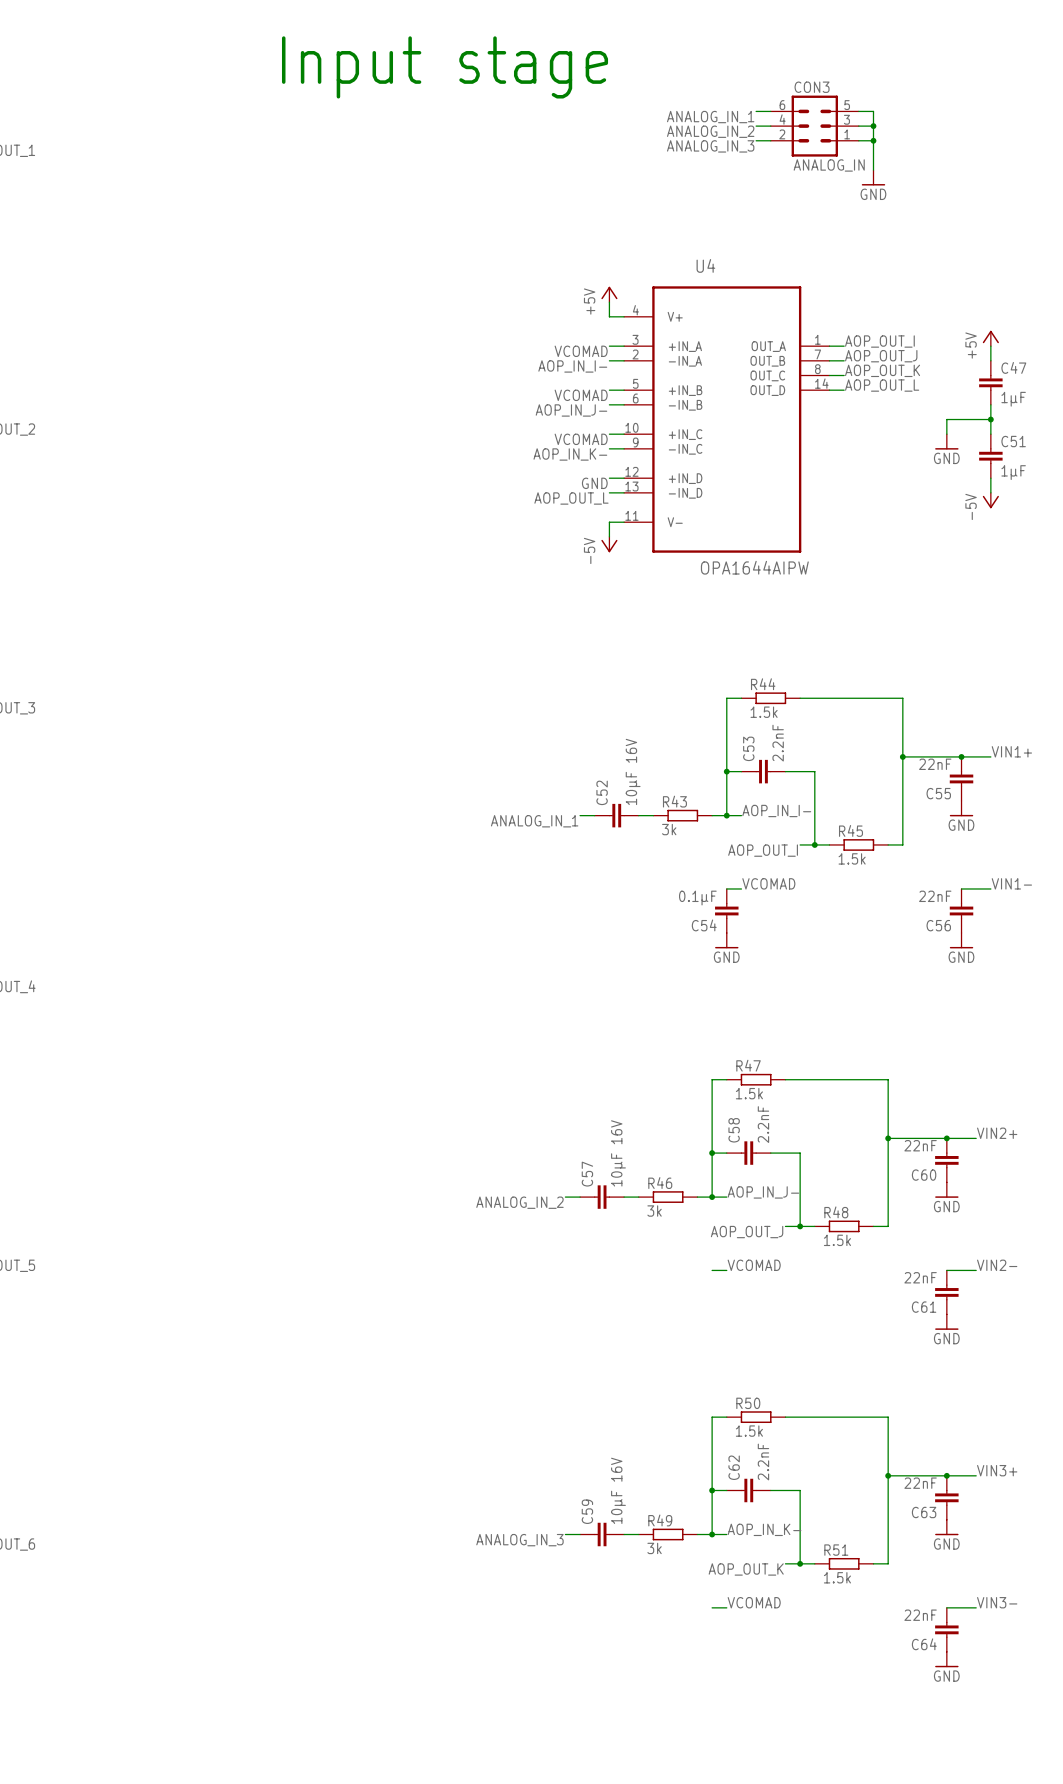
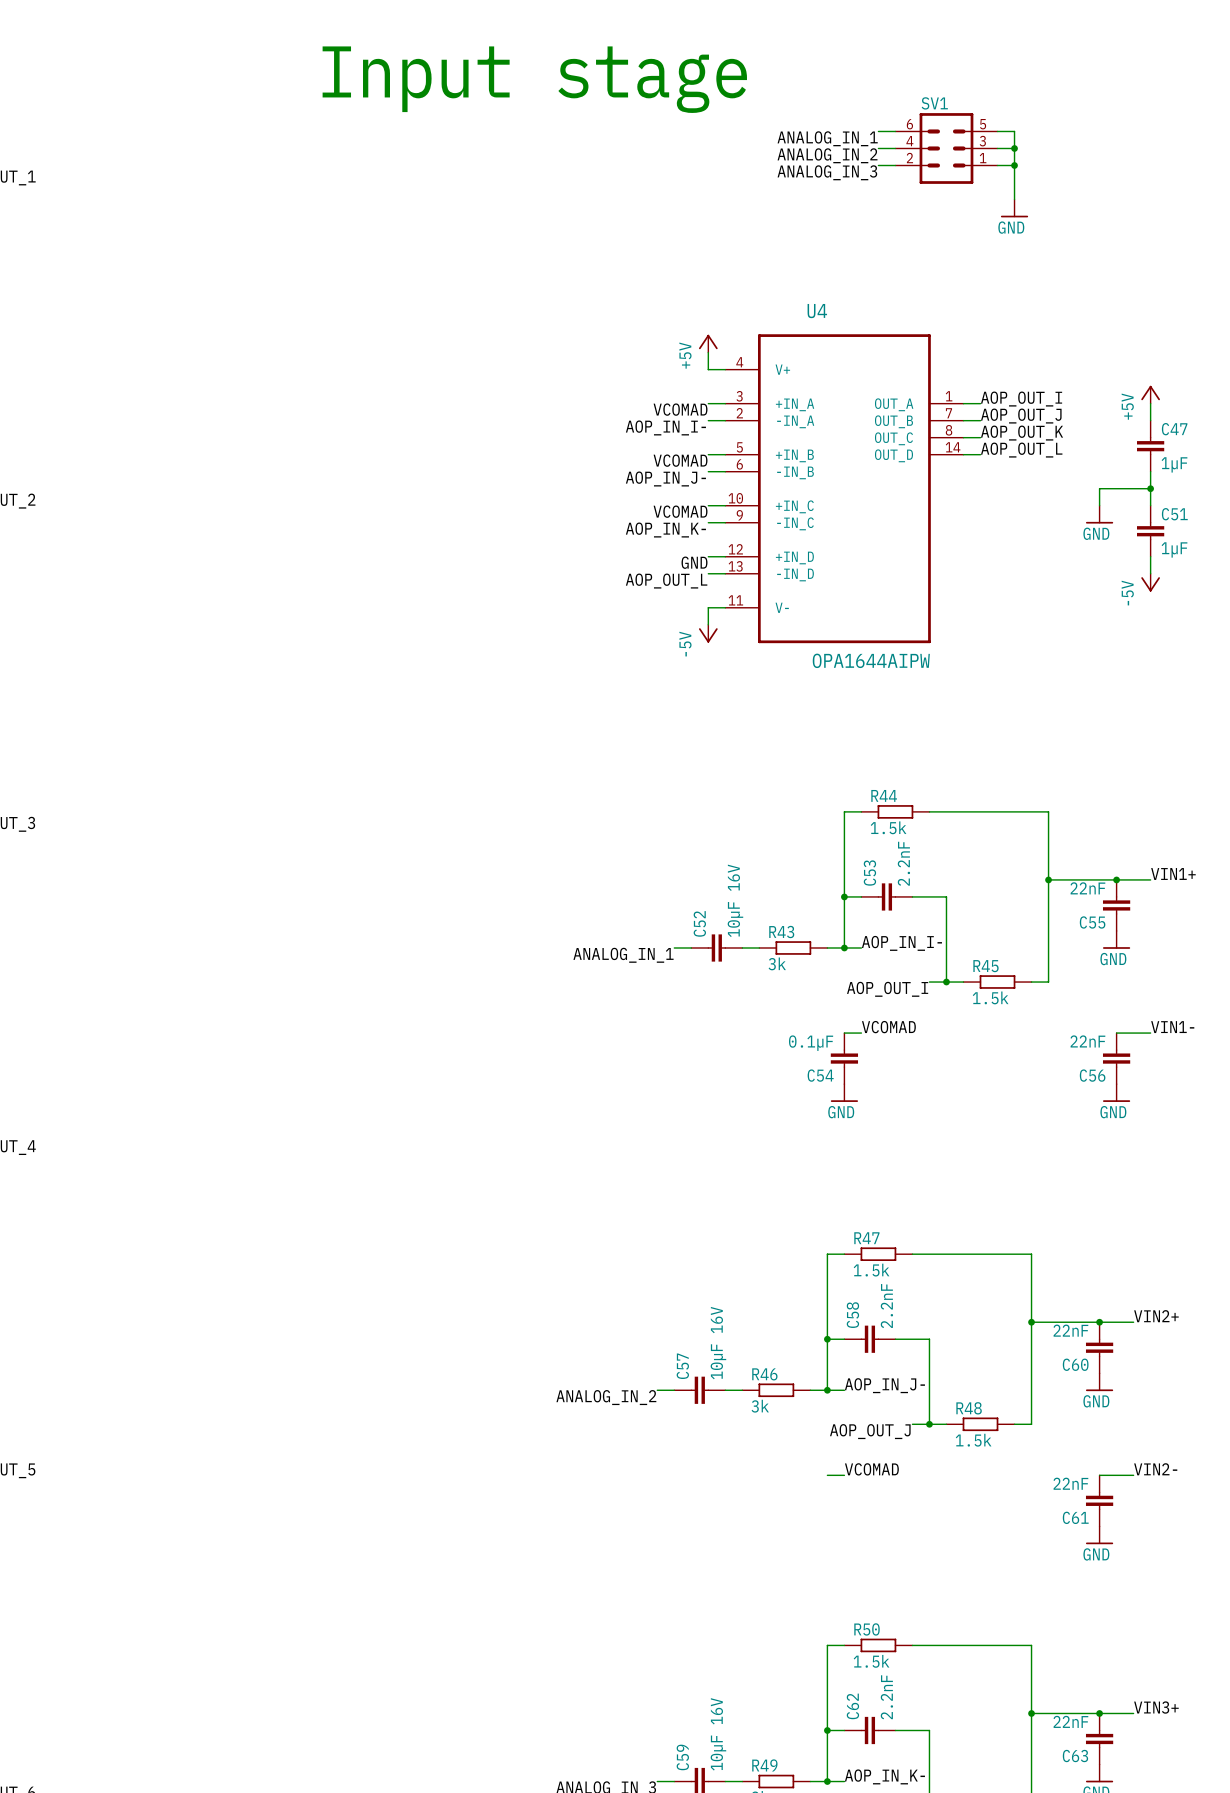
CON3 name: CON3 (812, 87) -> SV1 (934, 103)
CON3 value: ANALOG_IN (829, 165) -> none

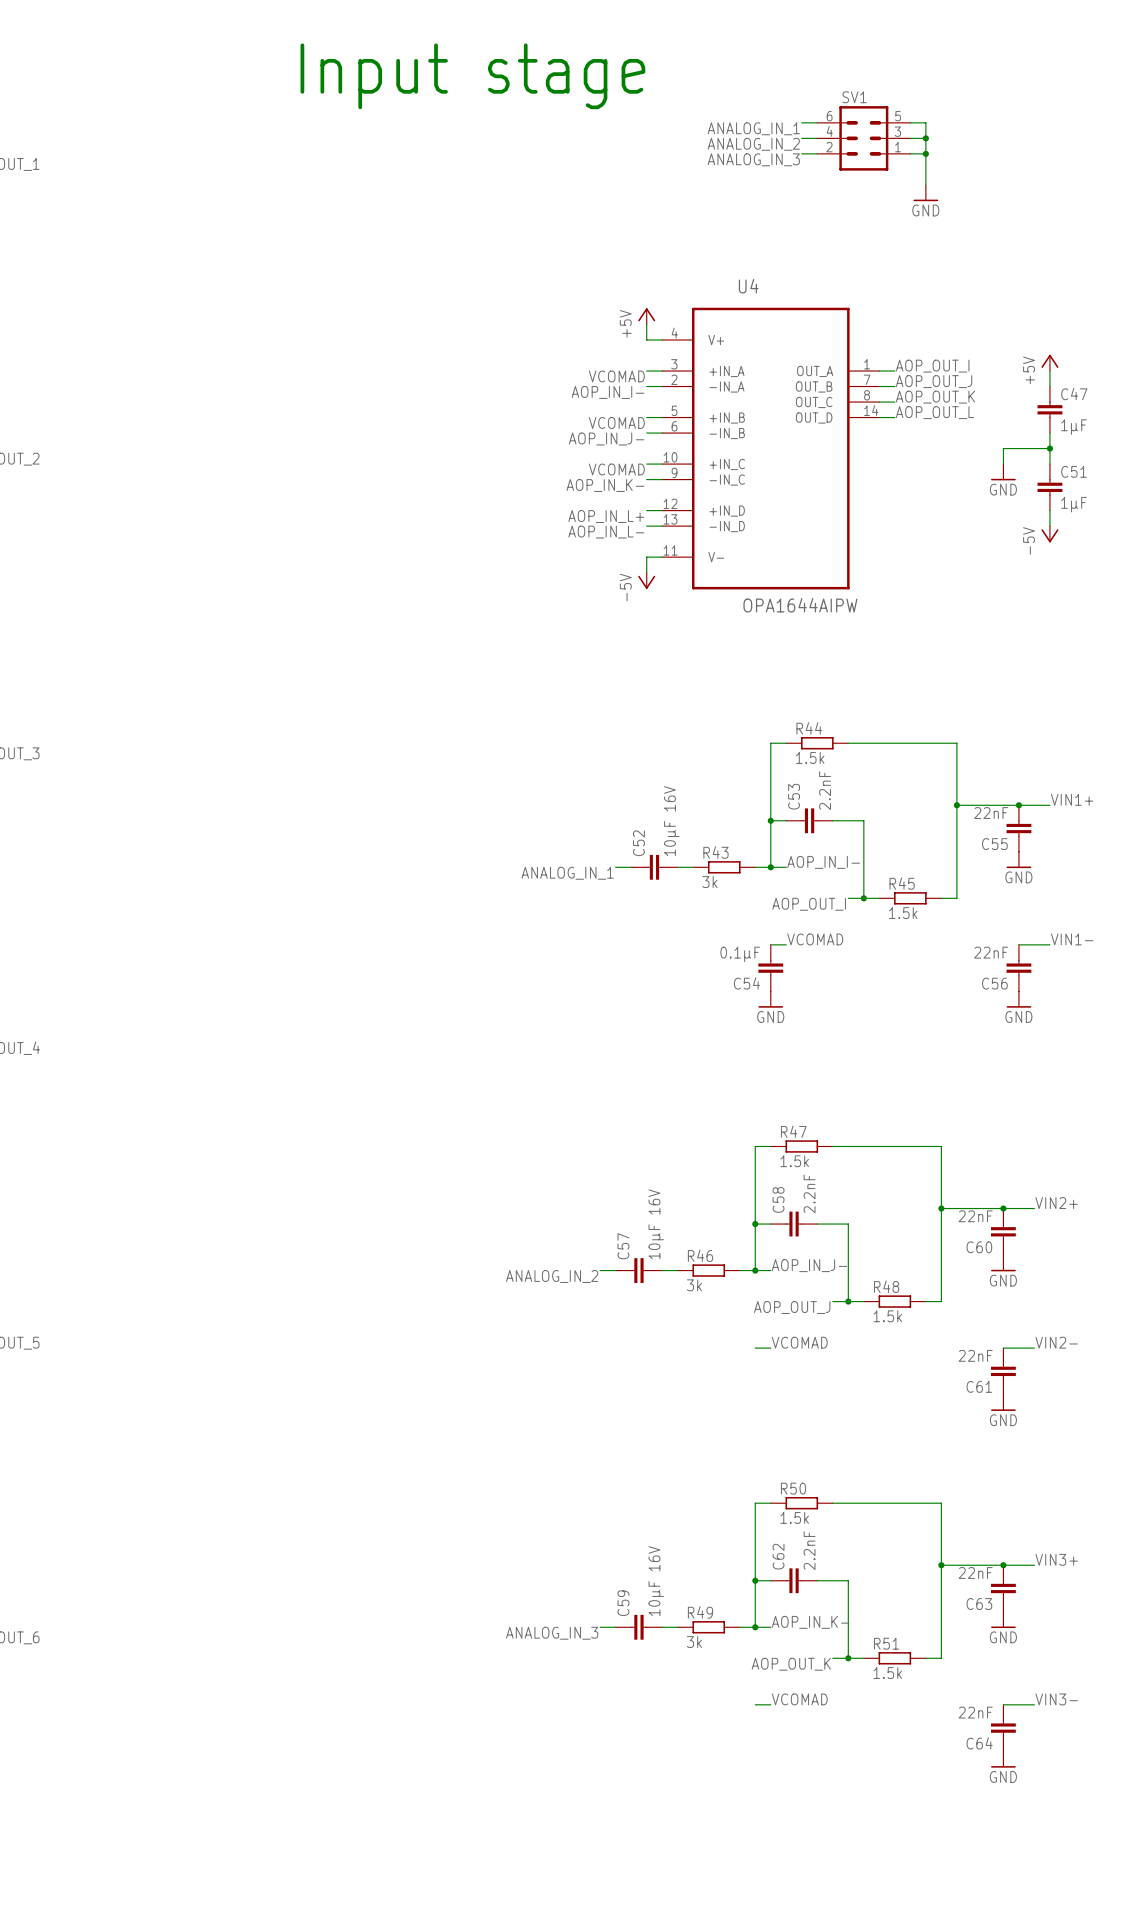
label: GND (694, 562) -> AOP_IN_L+ (606, 516)
label: AOP_OUT_L (666, 581) -> AOP_IN_L- (606, 532)

